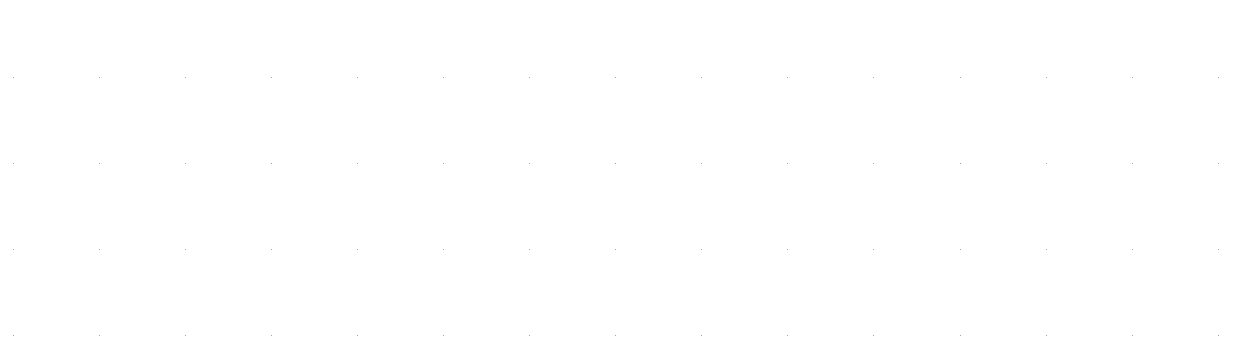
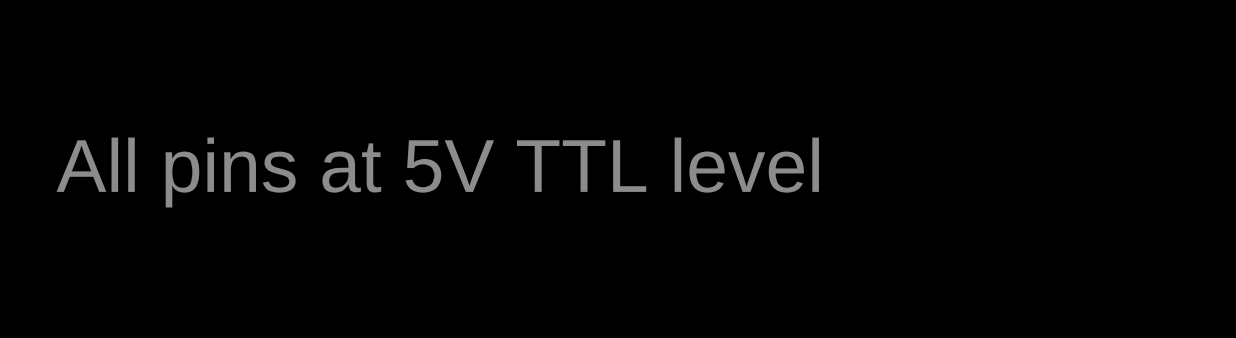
text: none -> All pins at 5V TTL level (437, 172)

